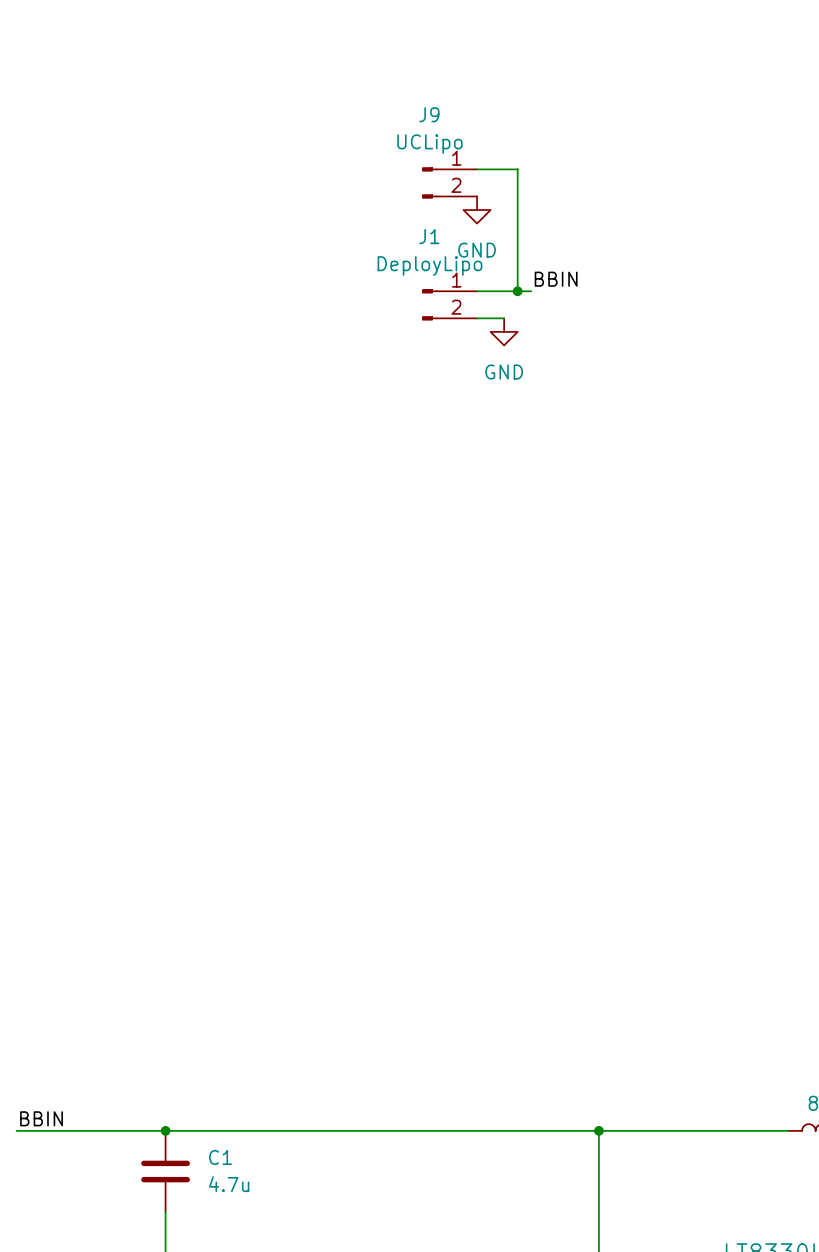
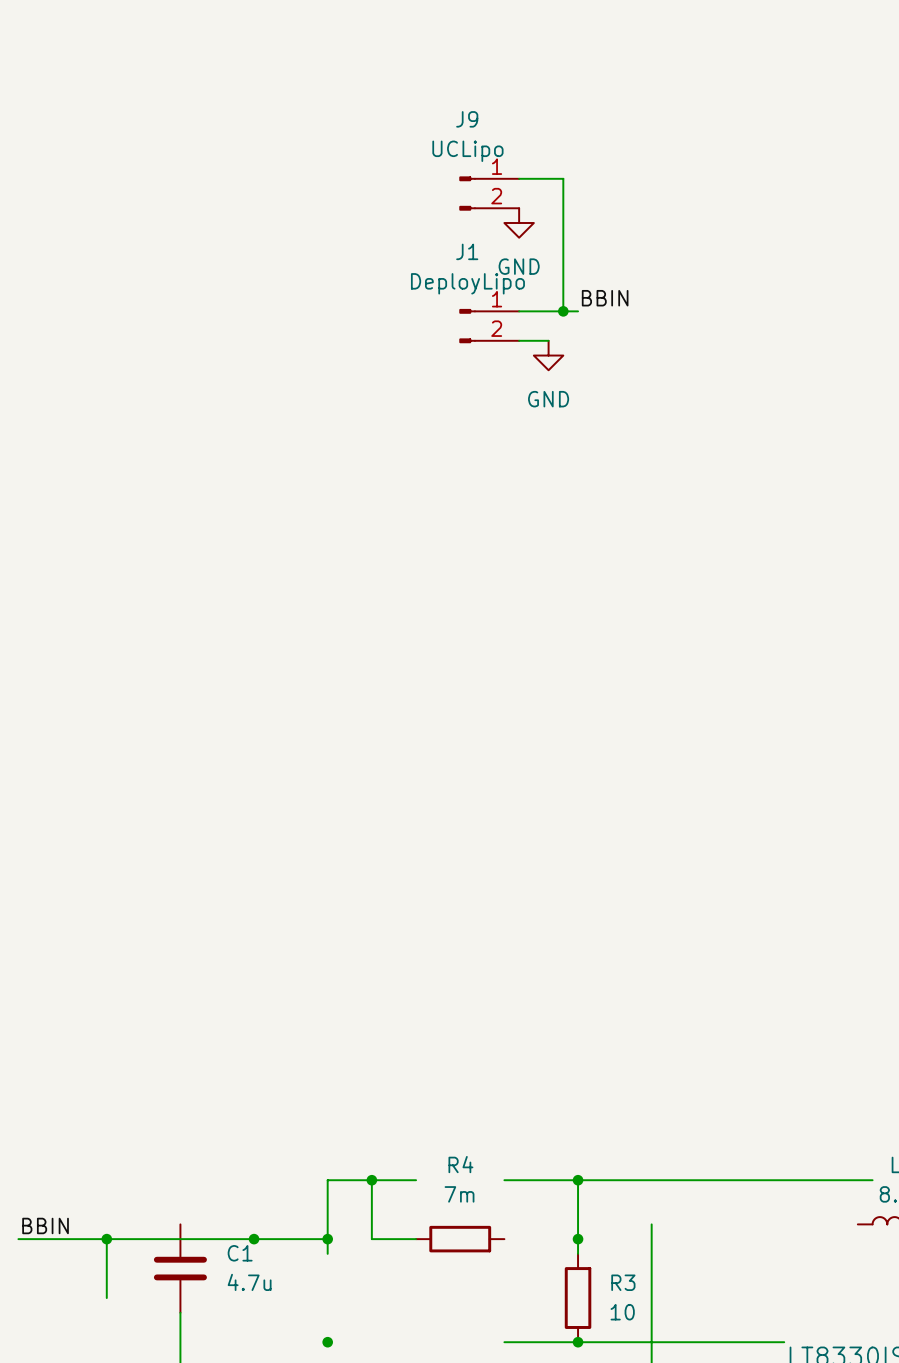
wire: none -> (371, 1180) (371, 1239) (416, 1239)
junction: none -> (371, 1180)
wire: none -> (416, 1180) (327, 1180) (327, 1253)
wire: none -> (504, 1180) (872, 1180)
wire: none -> (578, 1180) (578, 1253)
junction: none -> (578, 1180)
label position: BBIN (41, 1118) -> BBIN (45, 1225)
wire: (16, 1130) (788, 1130) -> none
junction: (165, 1130) -> none
junction: (598, 1130) -> none
wire: none -> (18, 1239) (327, 1239)
wire: none -> (106, 1239) (106, 1298)
junction: none -> (106, 1239)
junction: none -> (254, 1239)
junction: none -> (327, 1239)
R4: none -> 7m (460, 1239)
junction: none -> (578, 1239)
R3: none -> 10 (578, 1298)
junction: none -> (327, 1342)
wire: none -> (504, 1342) (784, 1342)
junction: none -> (578, 1342)

